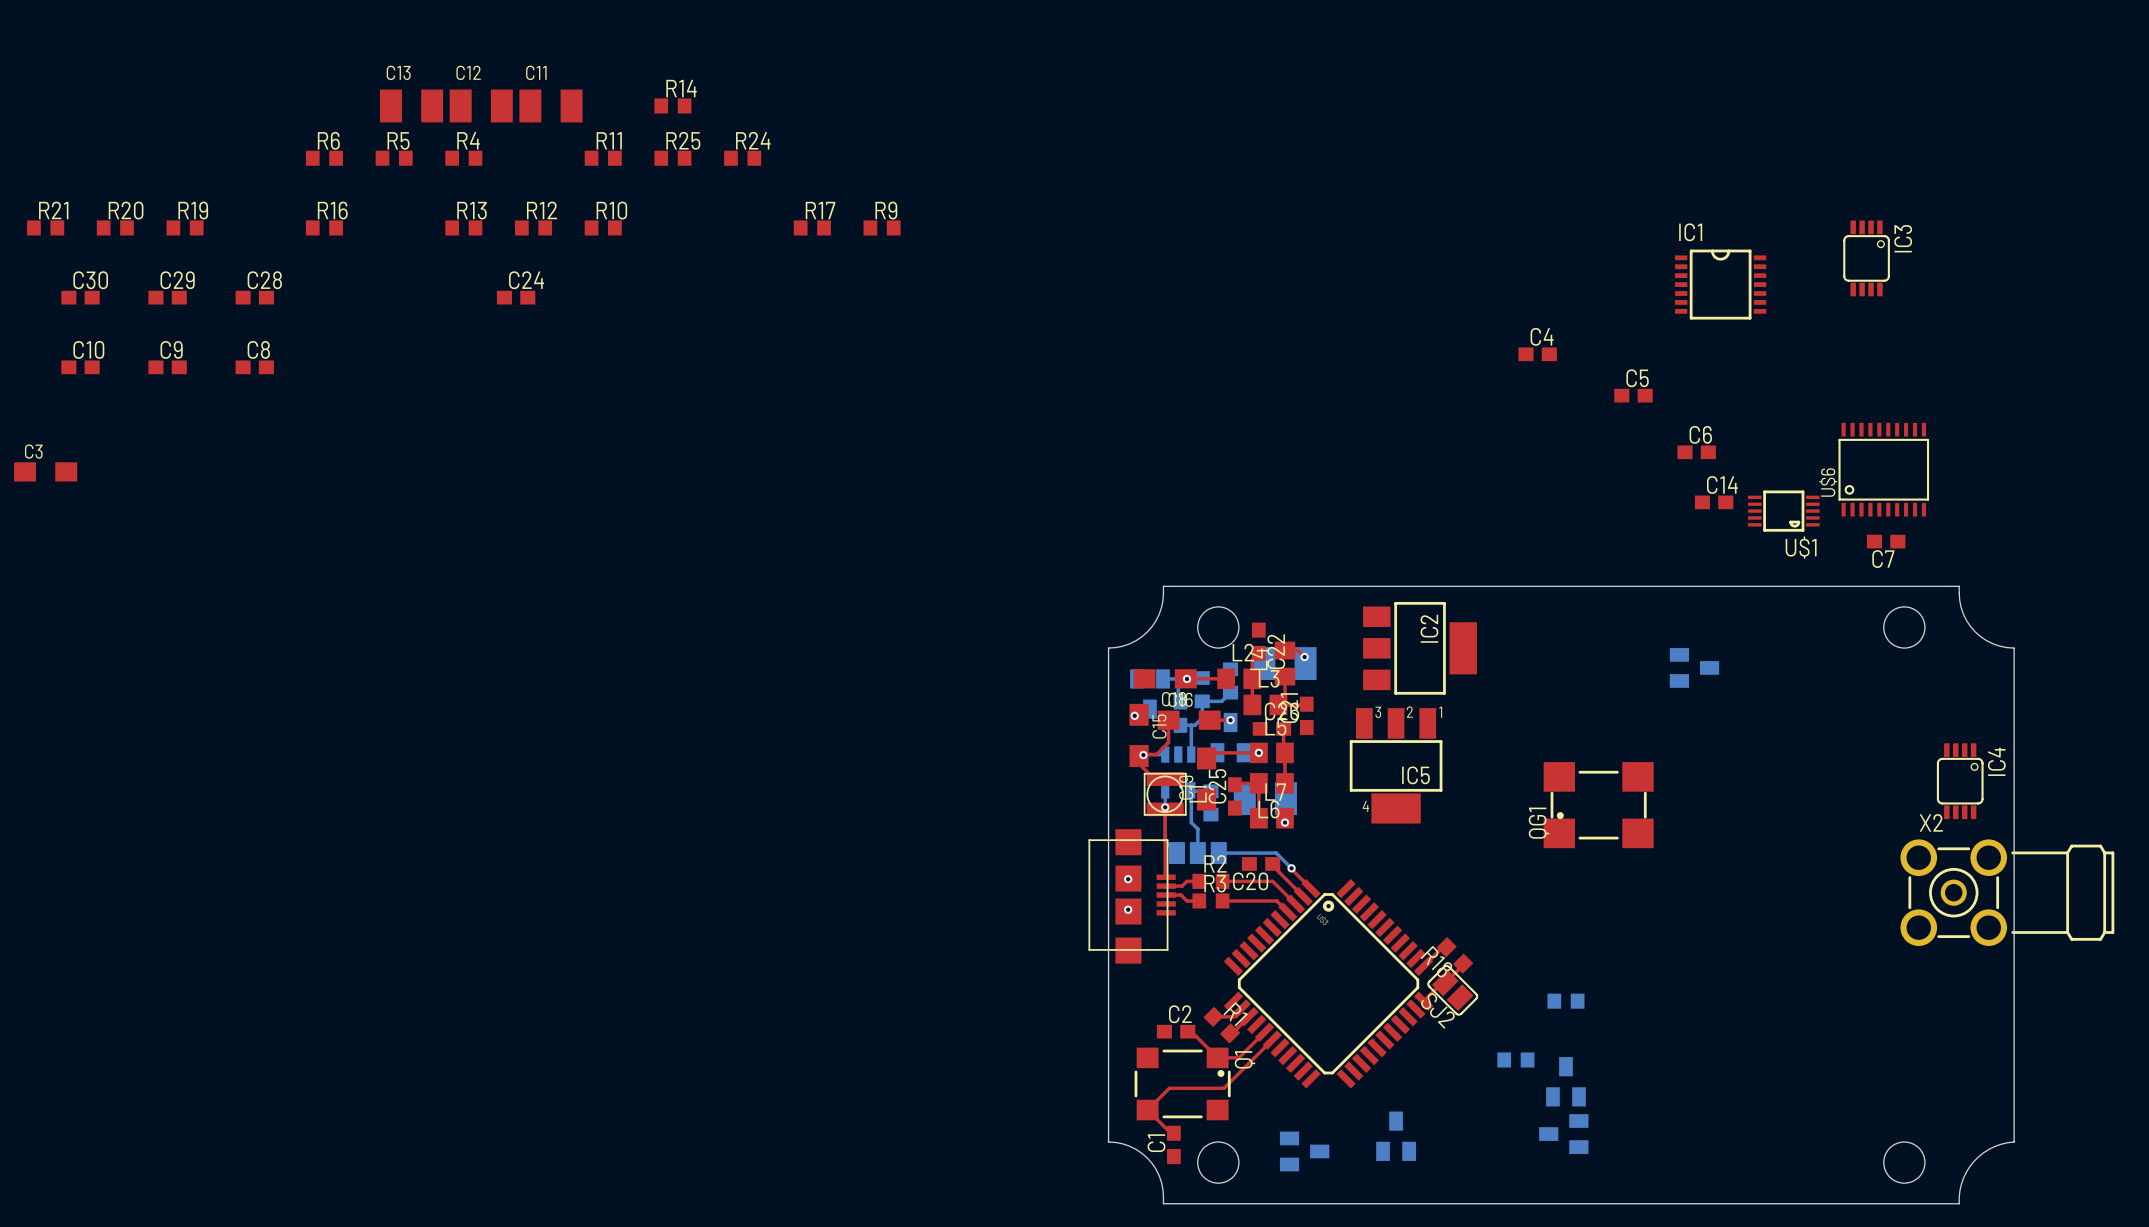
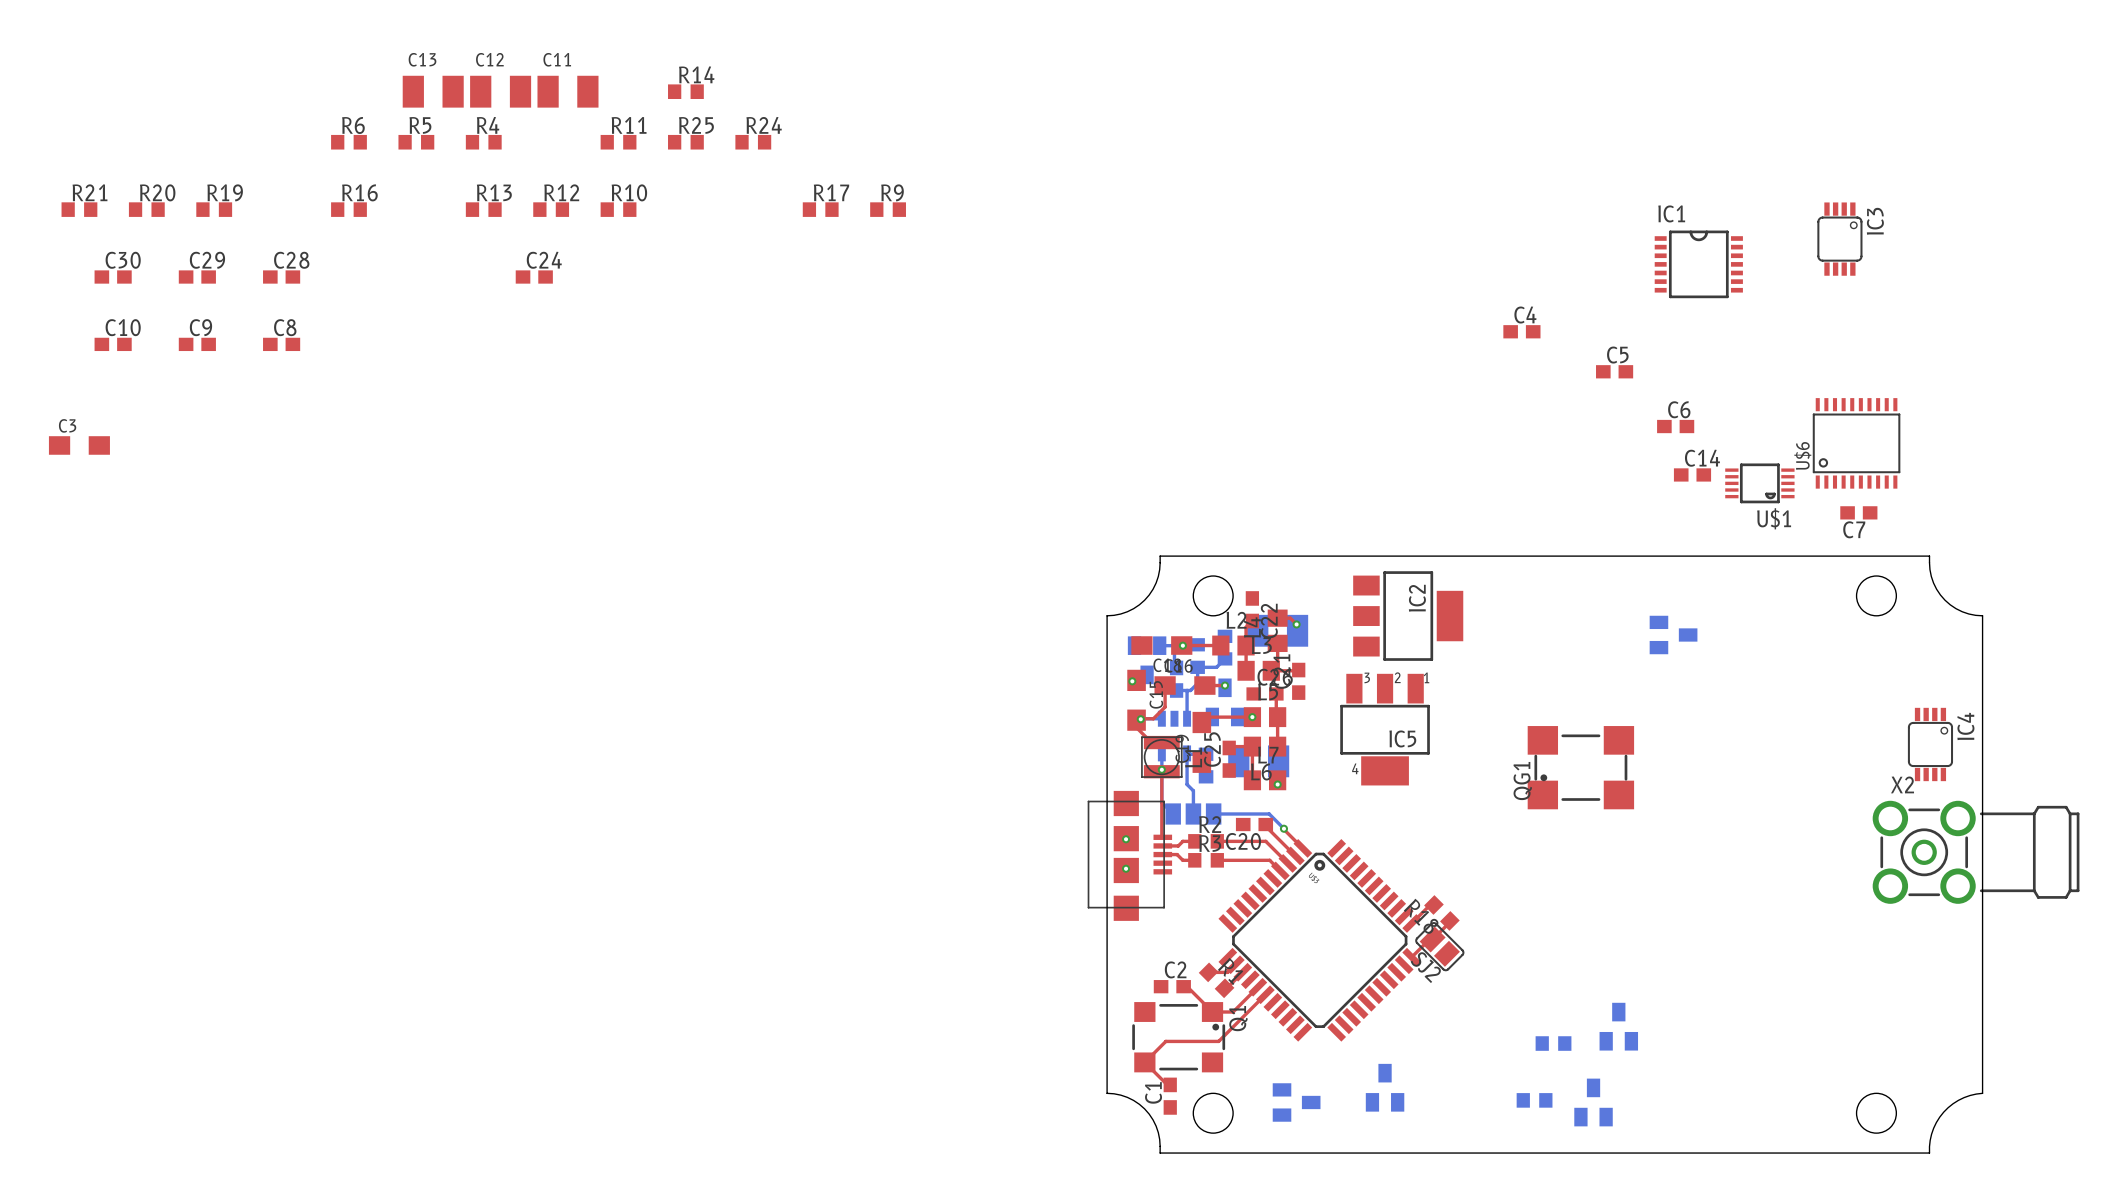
part: (1565, 1001) -> none
part footprint: [1546, 1057, 1586, 1107] -> [1535, 1036, 1572, 1051]
part: (1515, 1059) -> none
part: none -> (1618, 1026)
part: (1563, 1134) -> none
part: none -> (1534, 1100)
part: none -> (1593, 1102)

